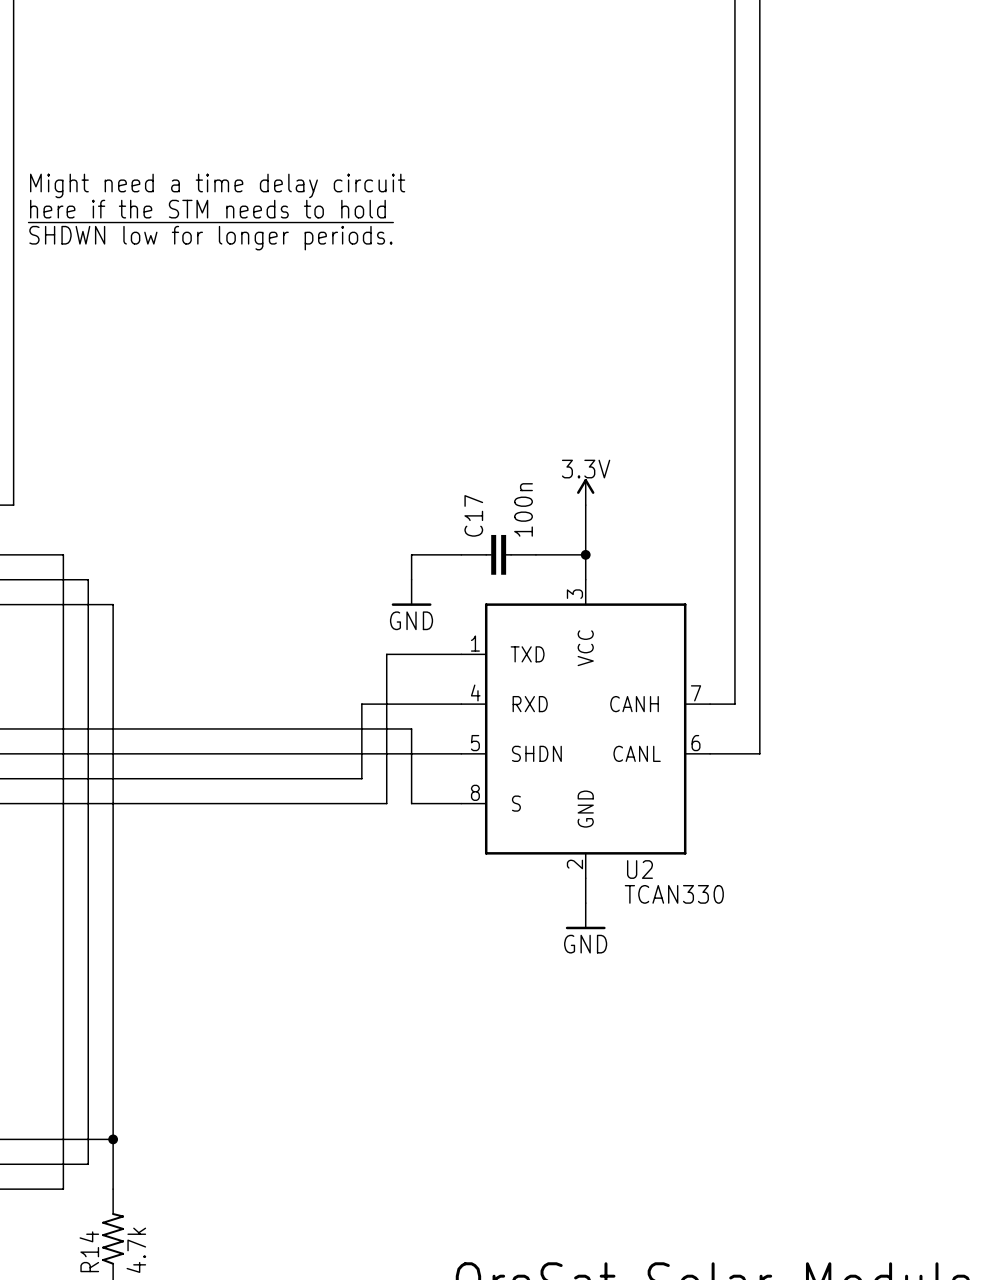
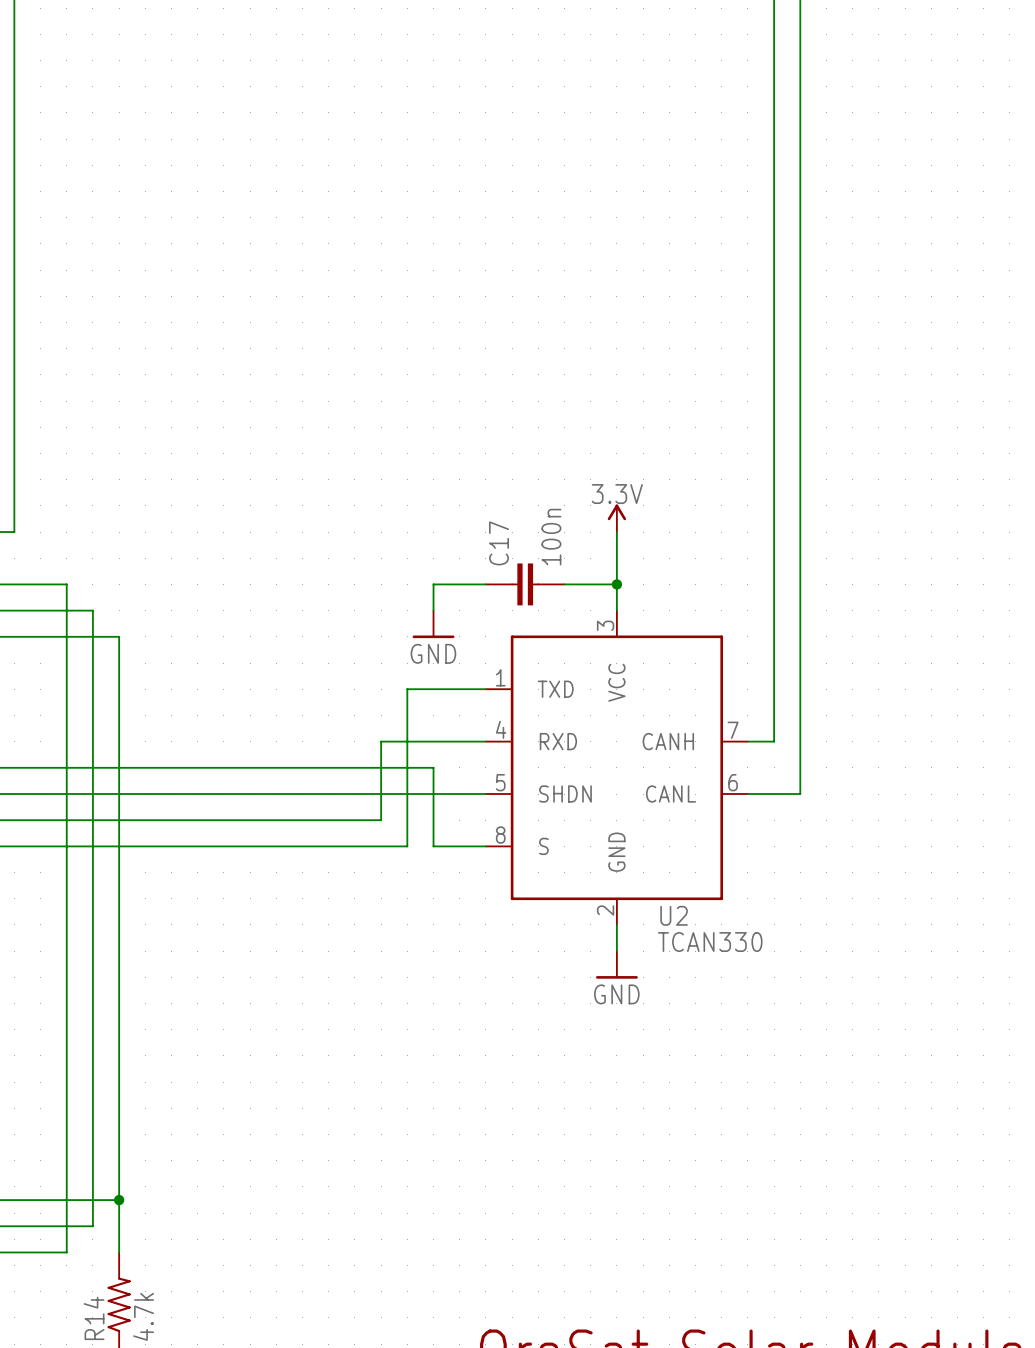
text: Might need a time delay circuit (217, 185) -> none
text: here if the STM needs to hold (207, 209) -> none
text: ~{SHDWN low for longer periods.} (210, 236) -> none

